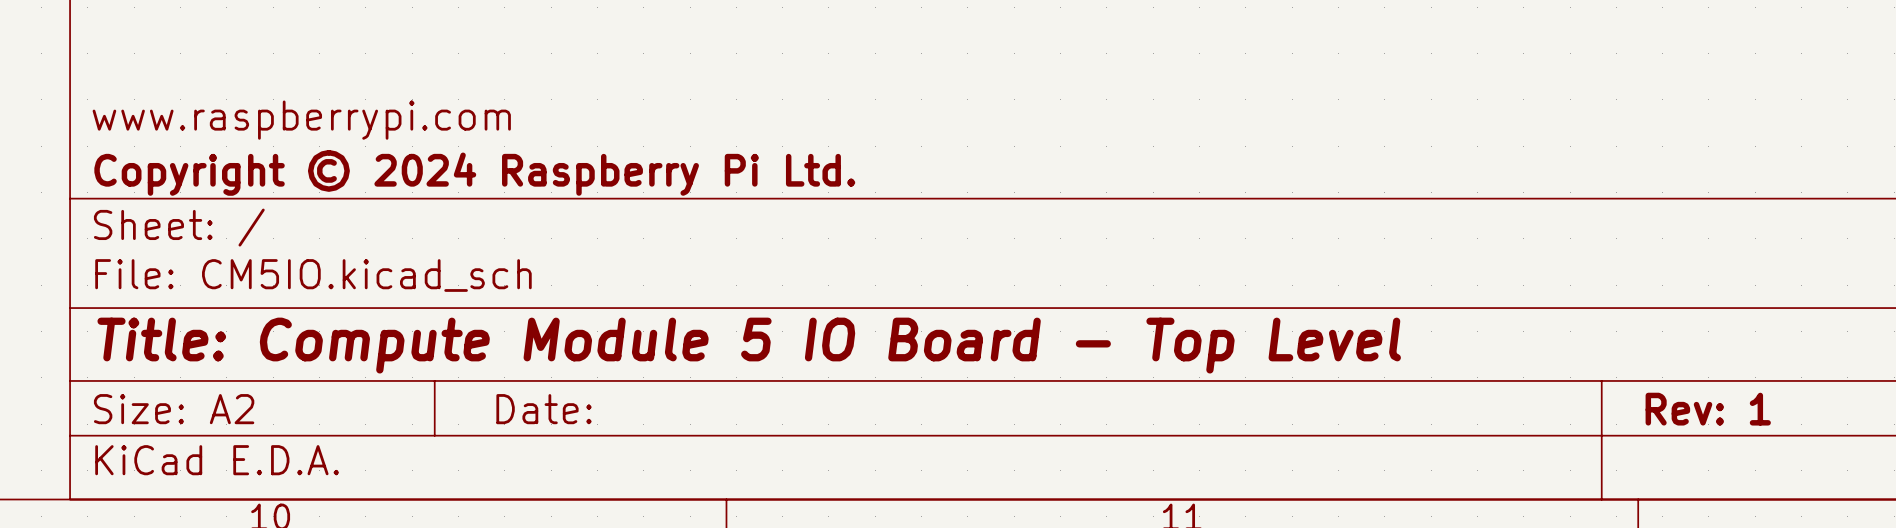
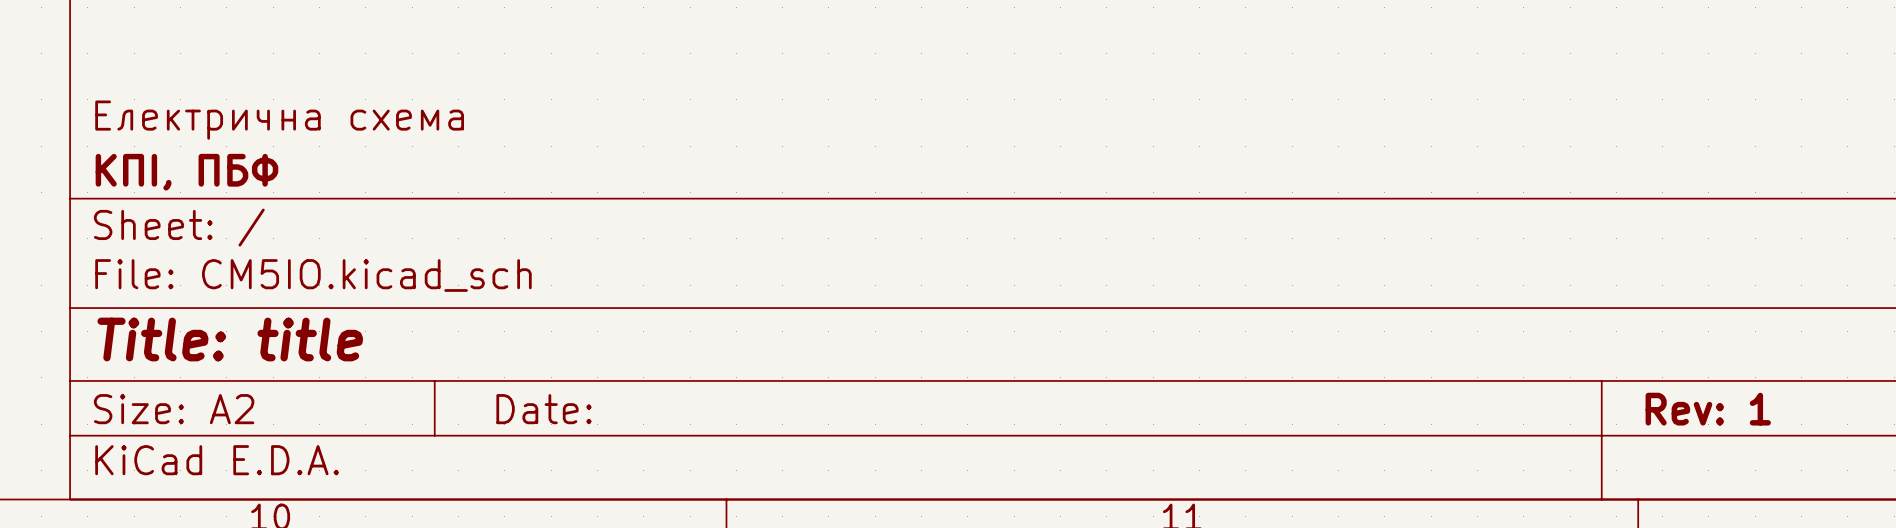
title block: www.raspberrypi.com (301, 120) -> Електрична схема (279, 120)
title block: Copyright © 2024 Raspberry Pi Ltd. (474, 172) -> КПІ, ПБФ (186, 172)
title block: Title: Compute Module 5 IO Board - Top Level (749, 345) -> Title: title (230, 339)

